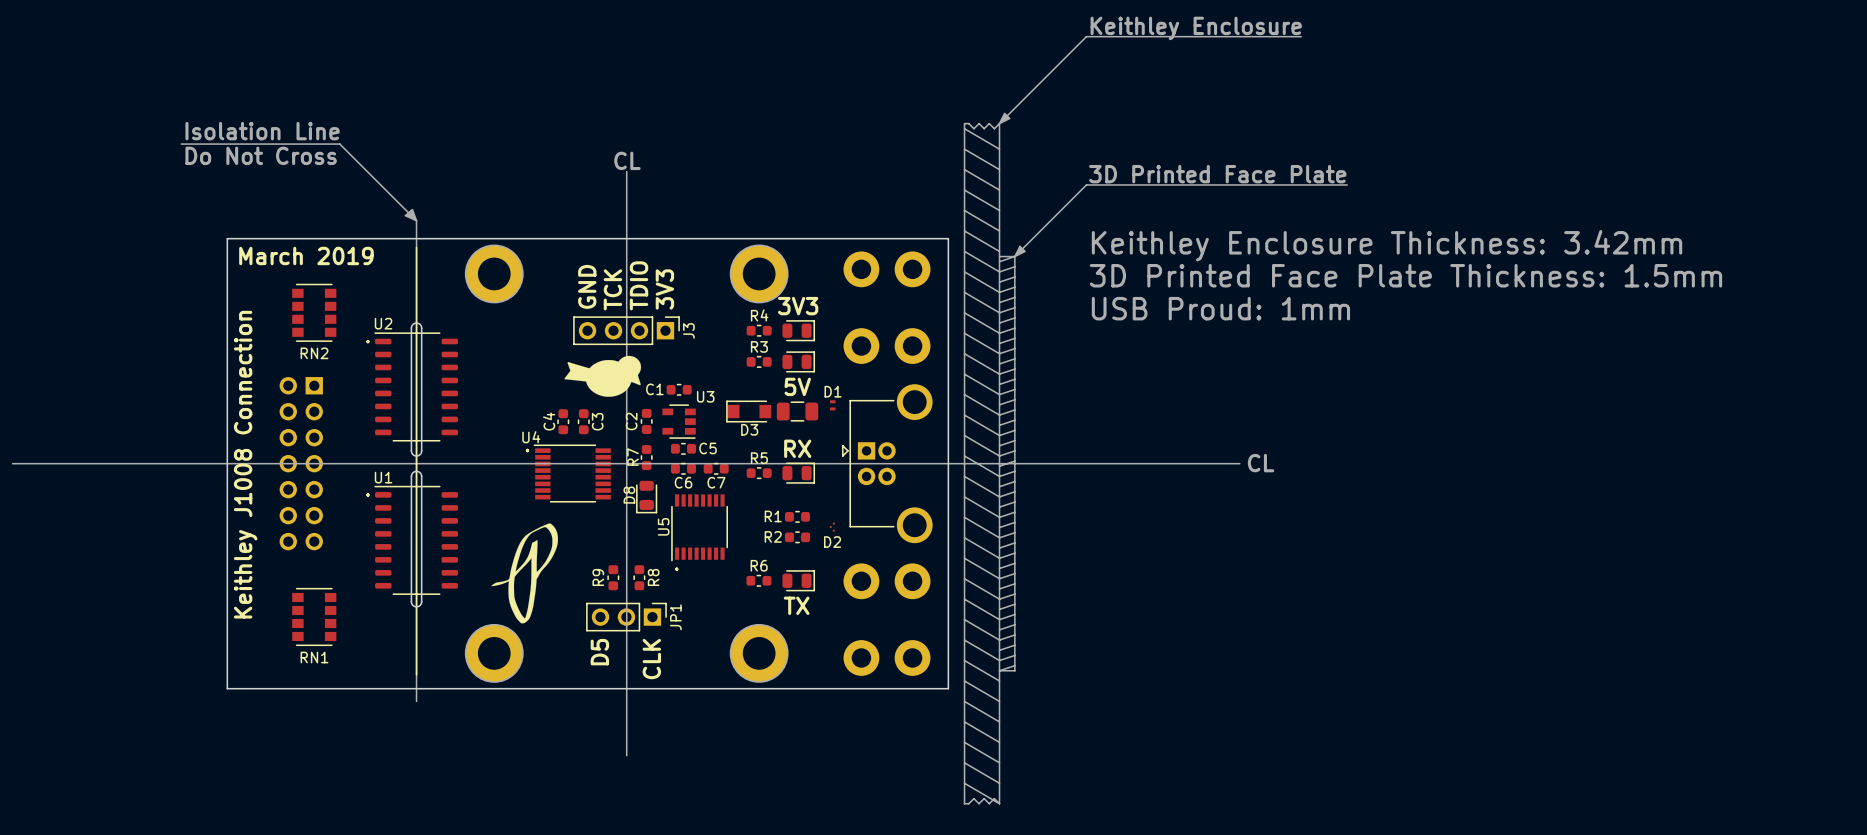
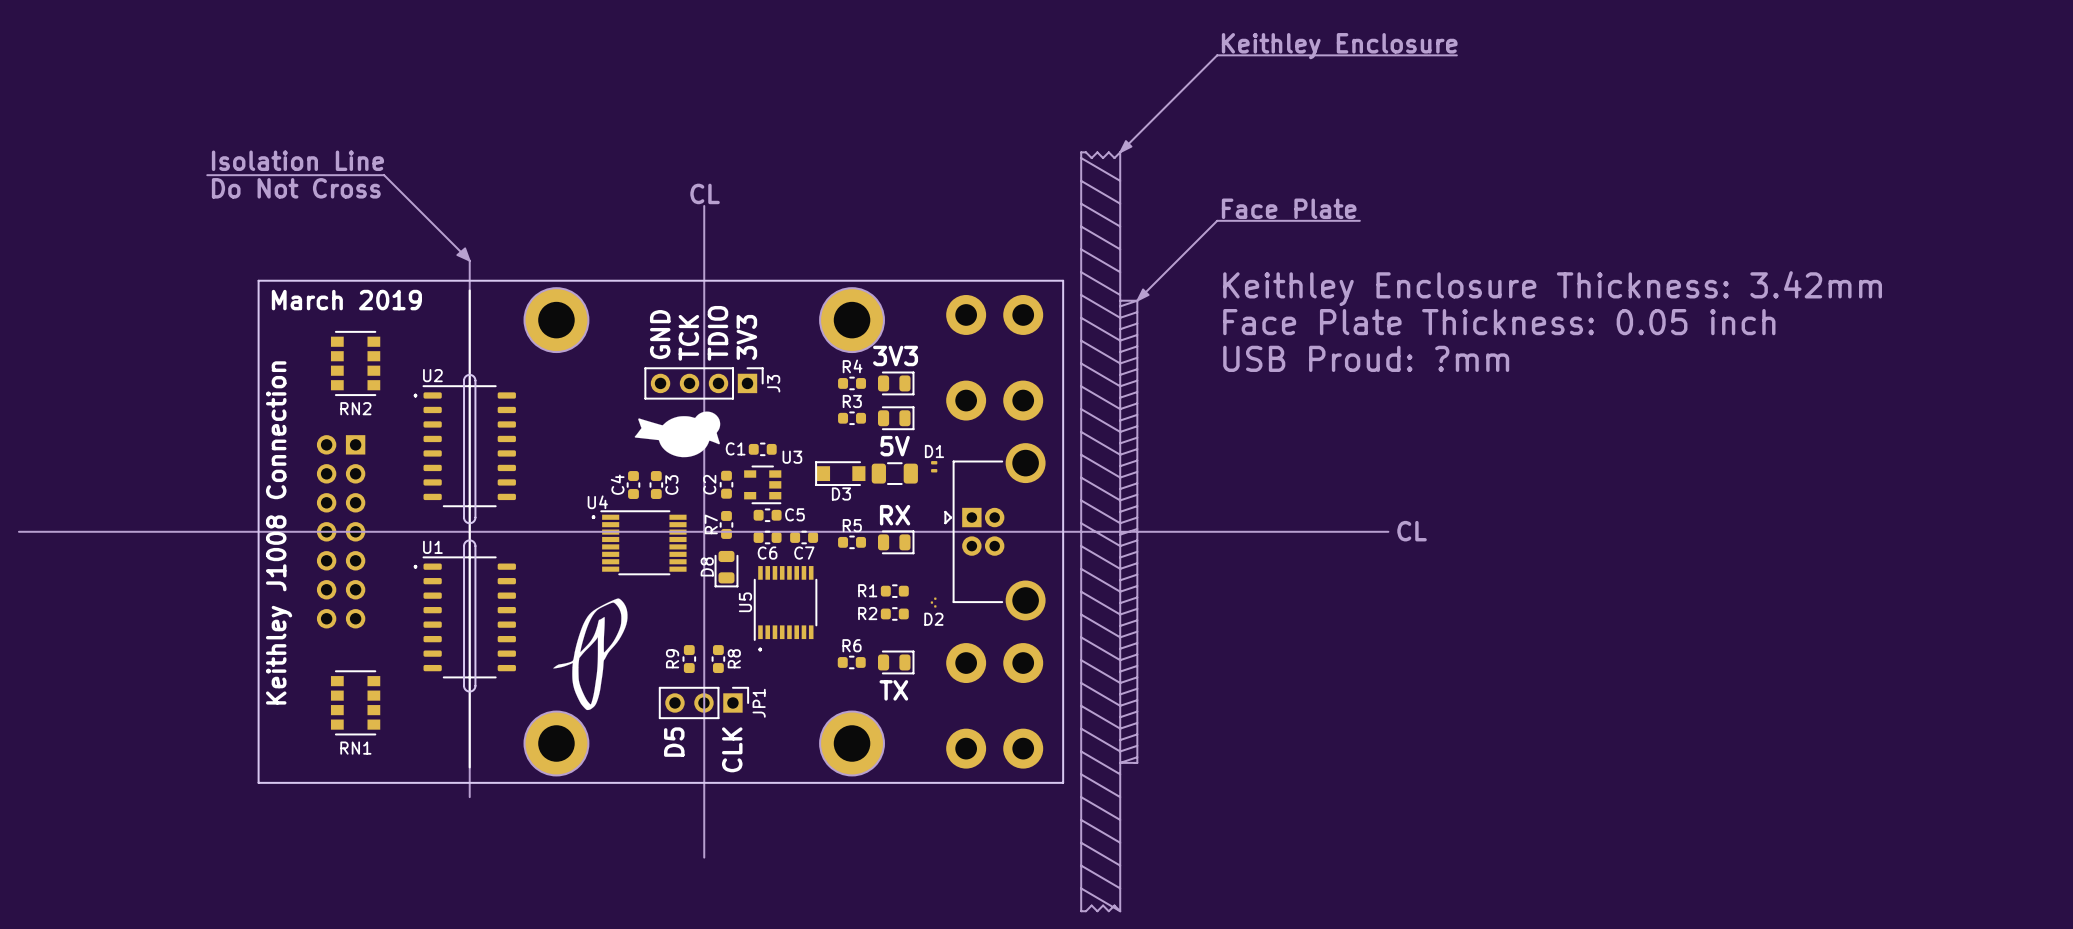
text: 3D Printed Face Plate (1217, 174) -> Face Plate (1289, 208)
line: (1214, 184) (1347, 184) -> none
text: 3D Printed Face Plate Thickness: 1.5mm (1406, 275) -> Face Plate Thickness: 0.05 inch (1499, 322)
text: USB Proud: 1mm (1220, 308) -> USB Proud: ?mm (1366, 358)

